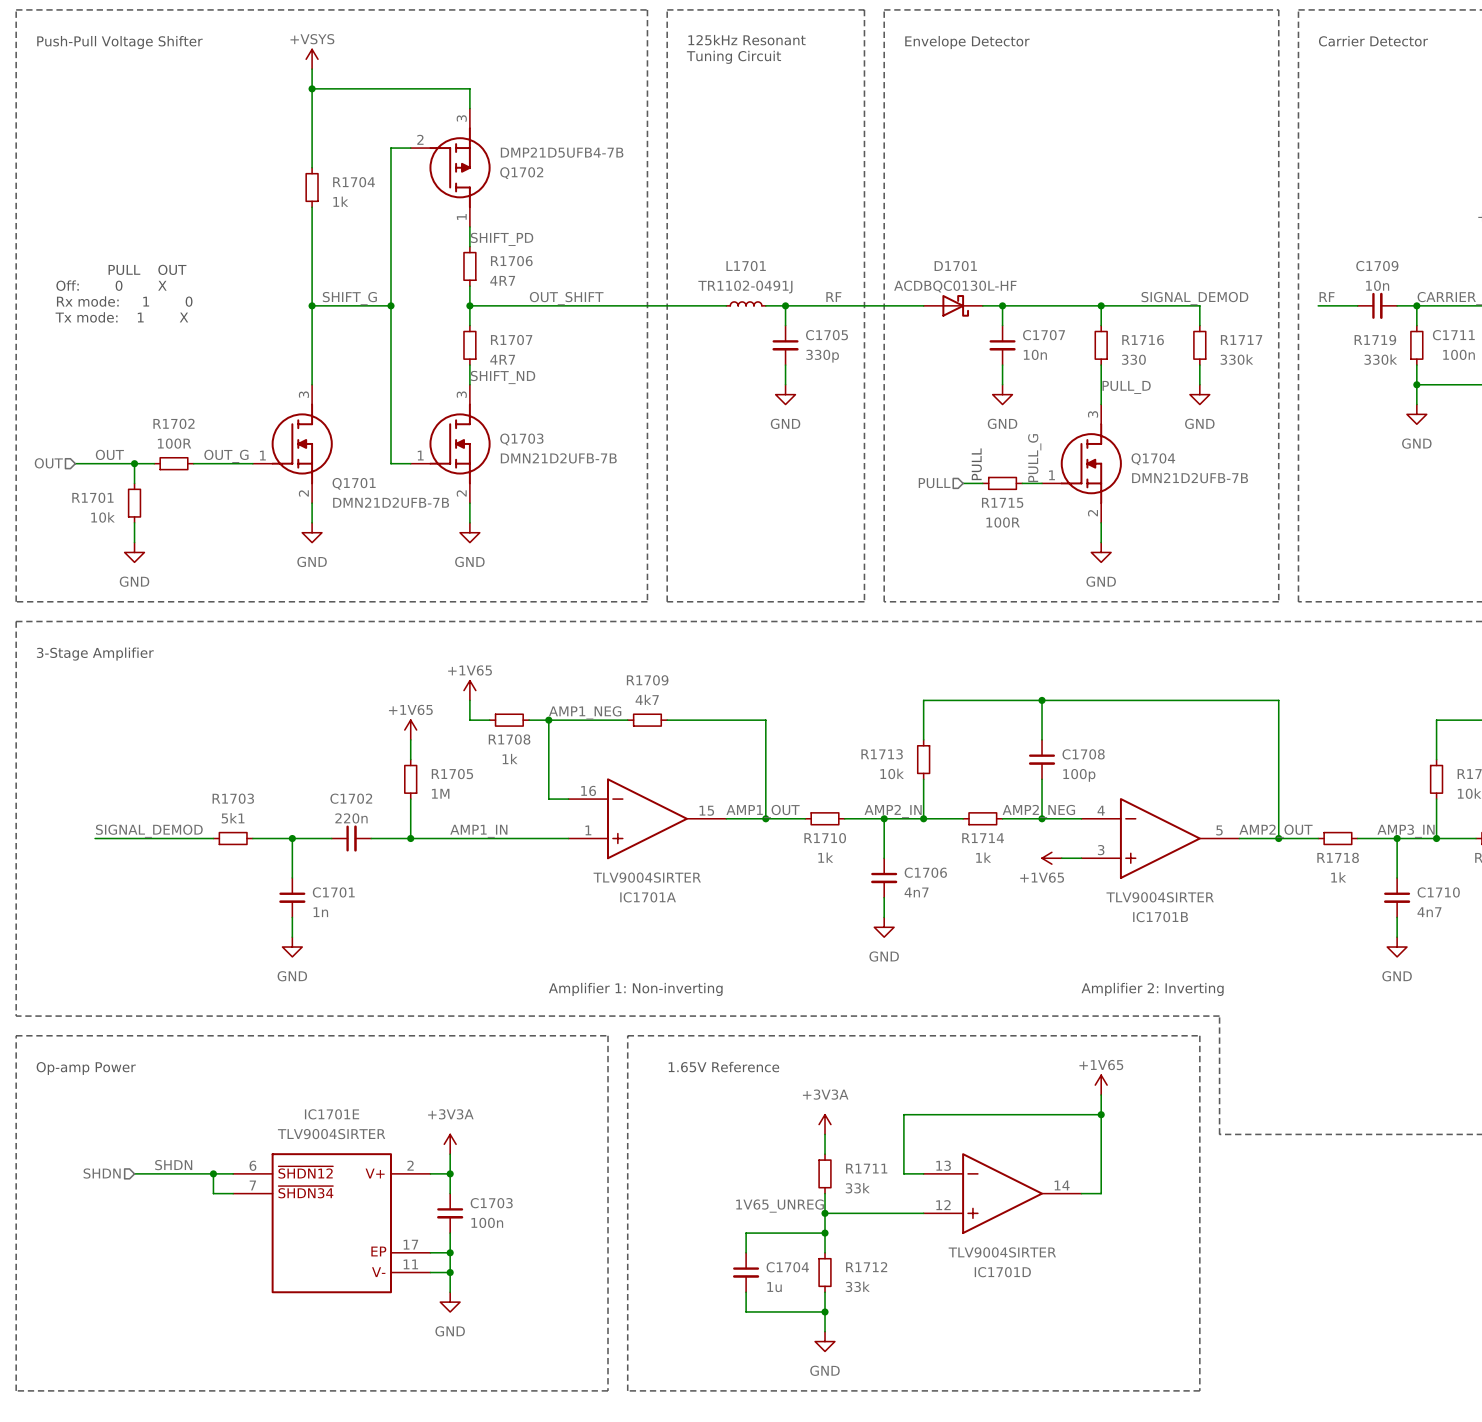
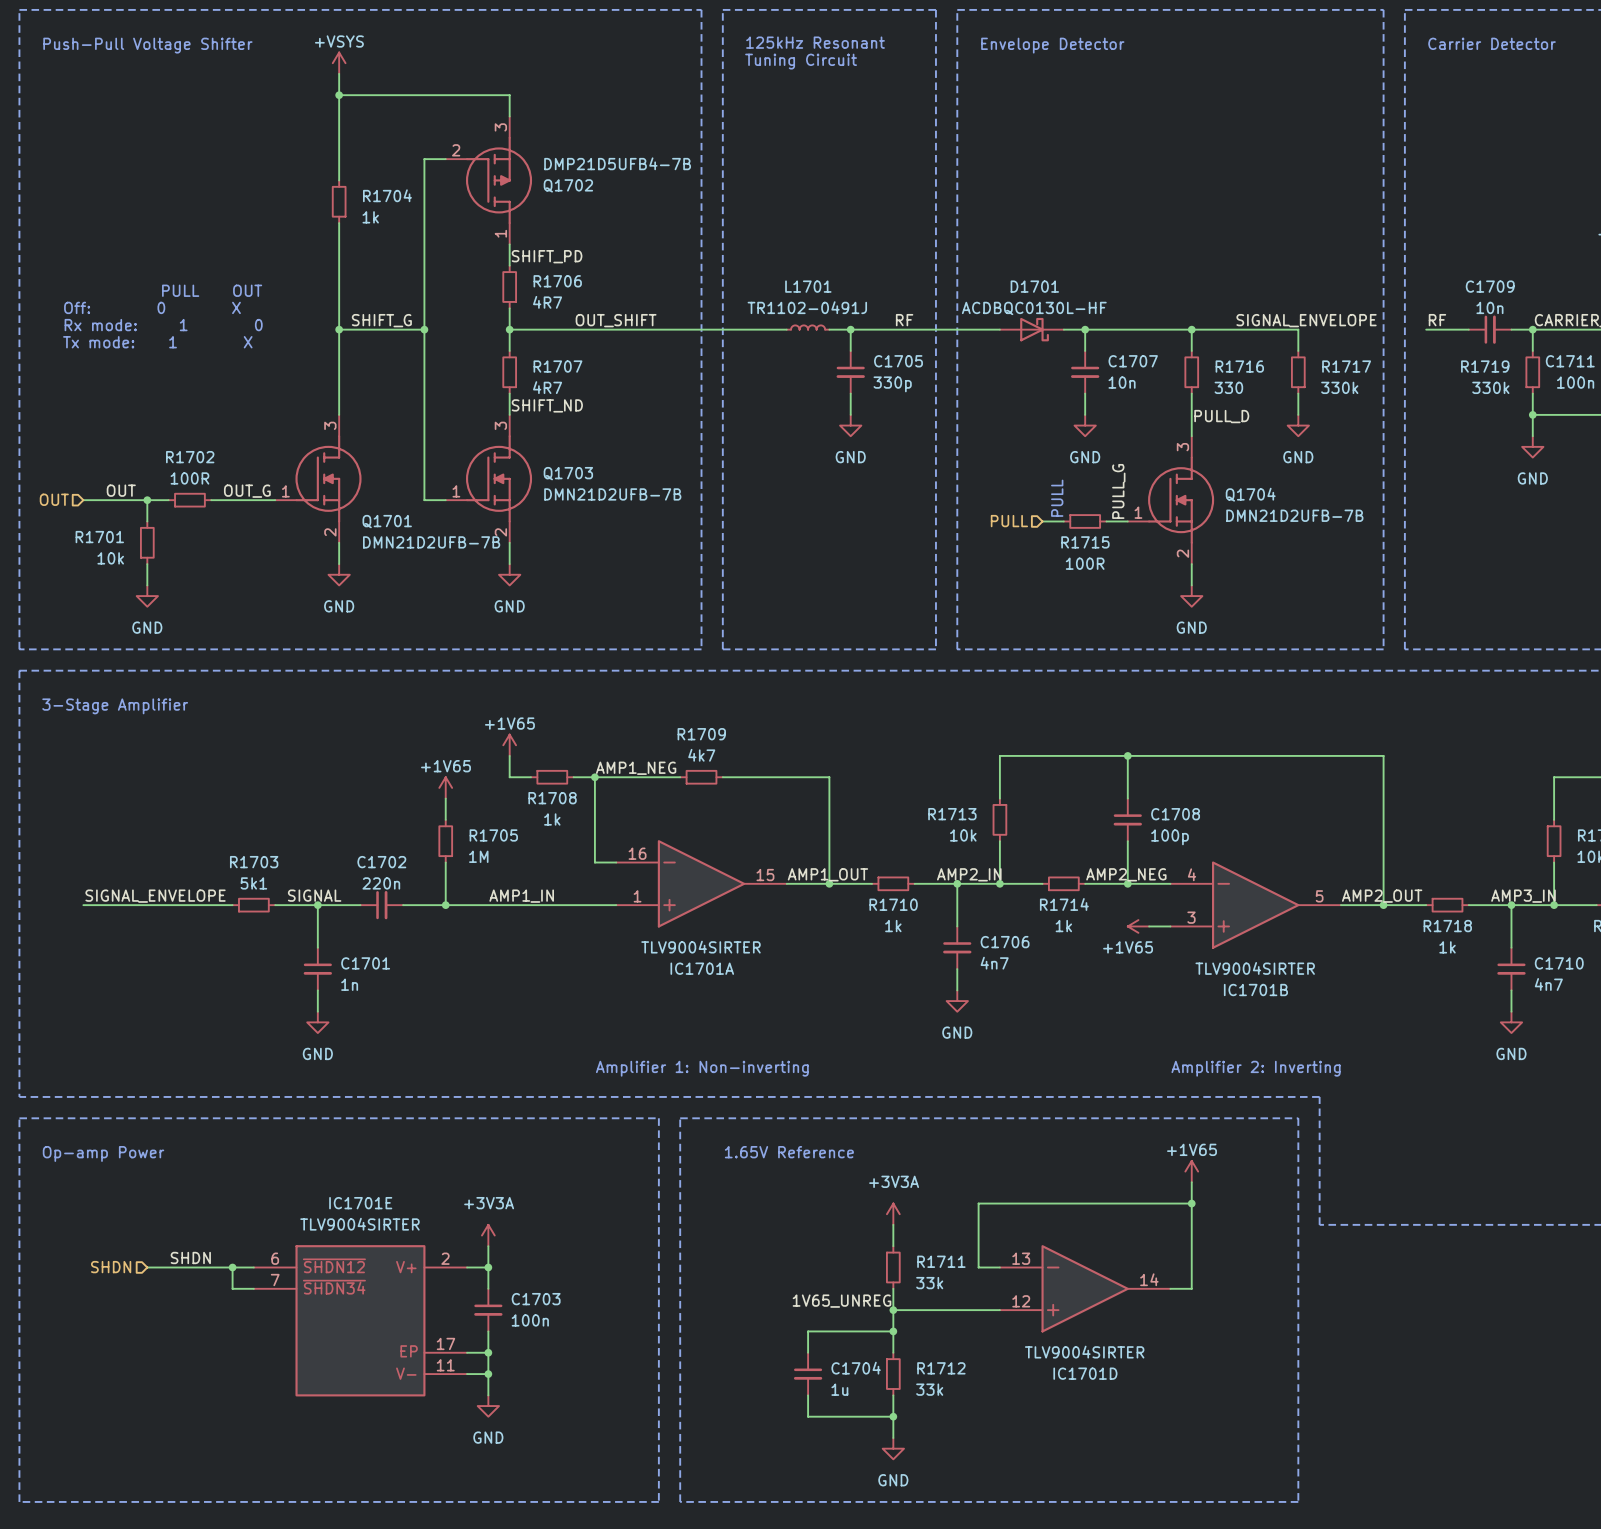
label: SIGNAL_DEMOD (1194, 298) -> SIGNAL_ENVELOPE (1306, 320)
label: none -> SIGNAL (314, 895)
label: SIGNAL_DEMOD (149, 831) -> SIGNAL_ENVELOPE (155, 896)
wire: none -> (83, 905) (104, 905)

